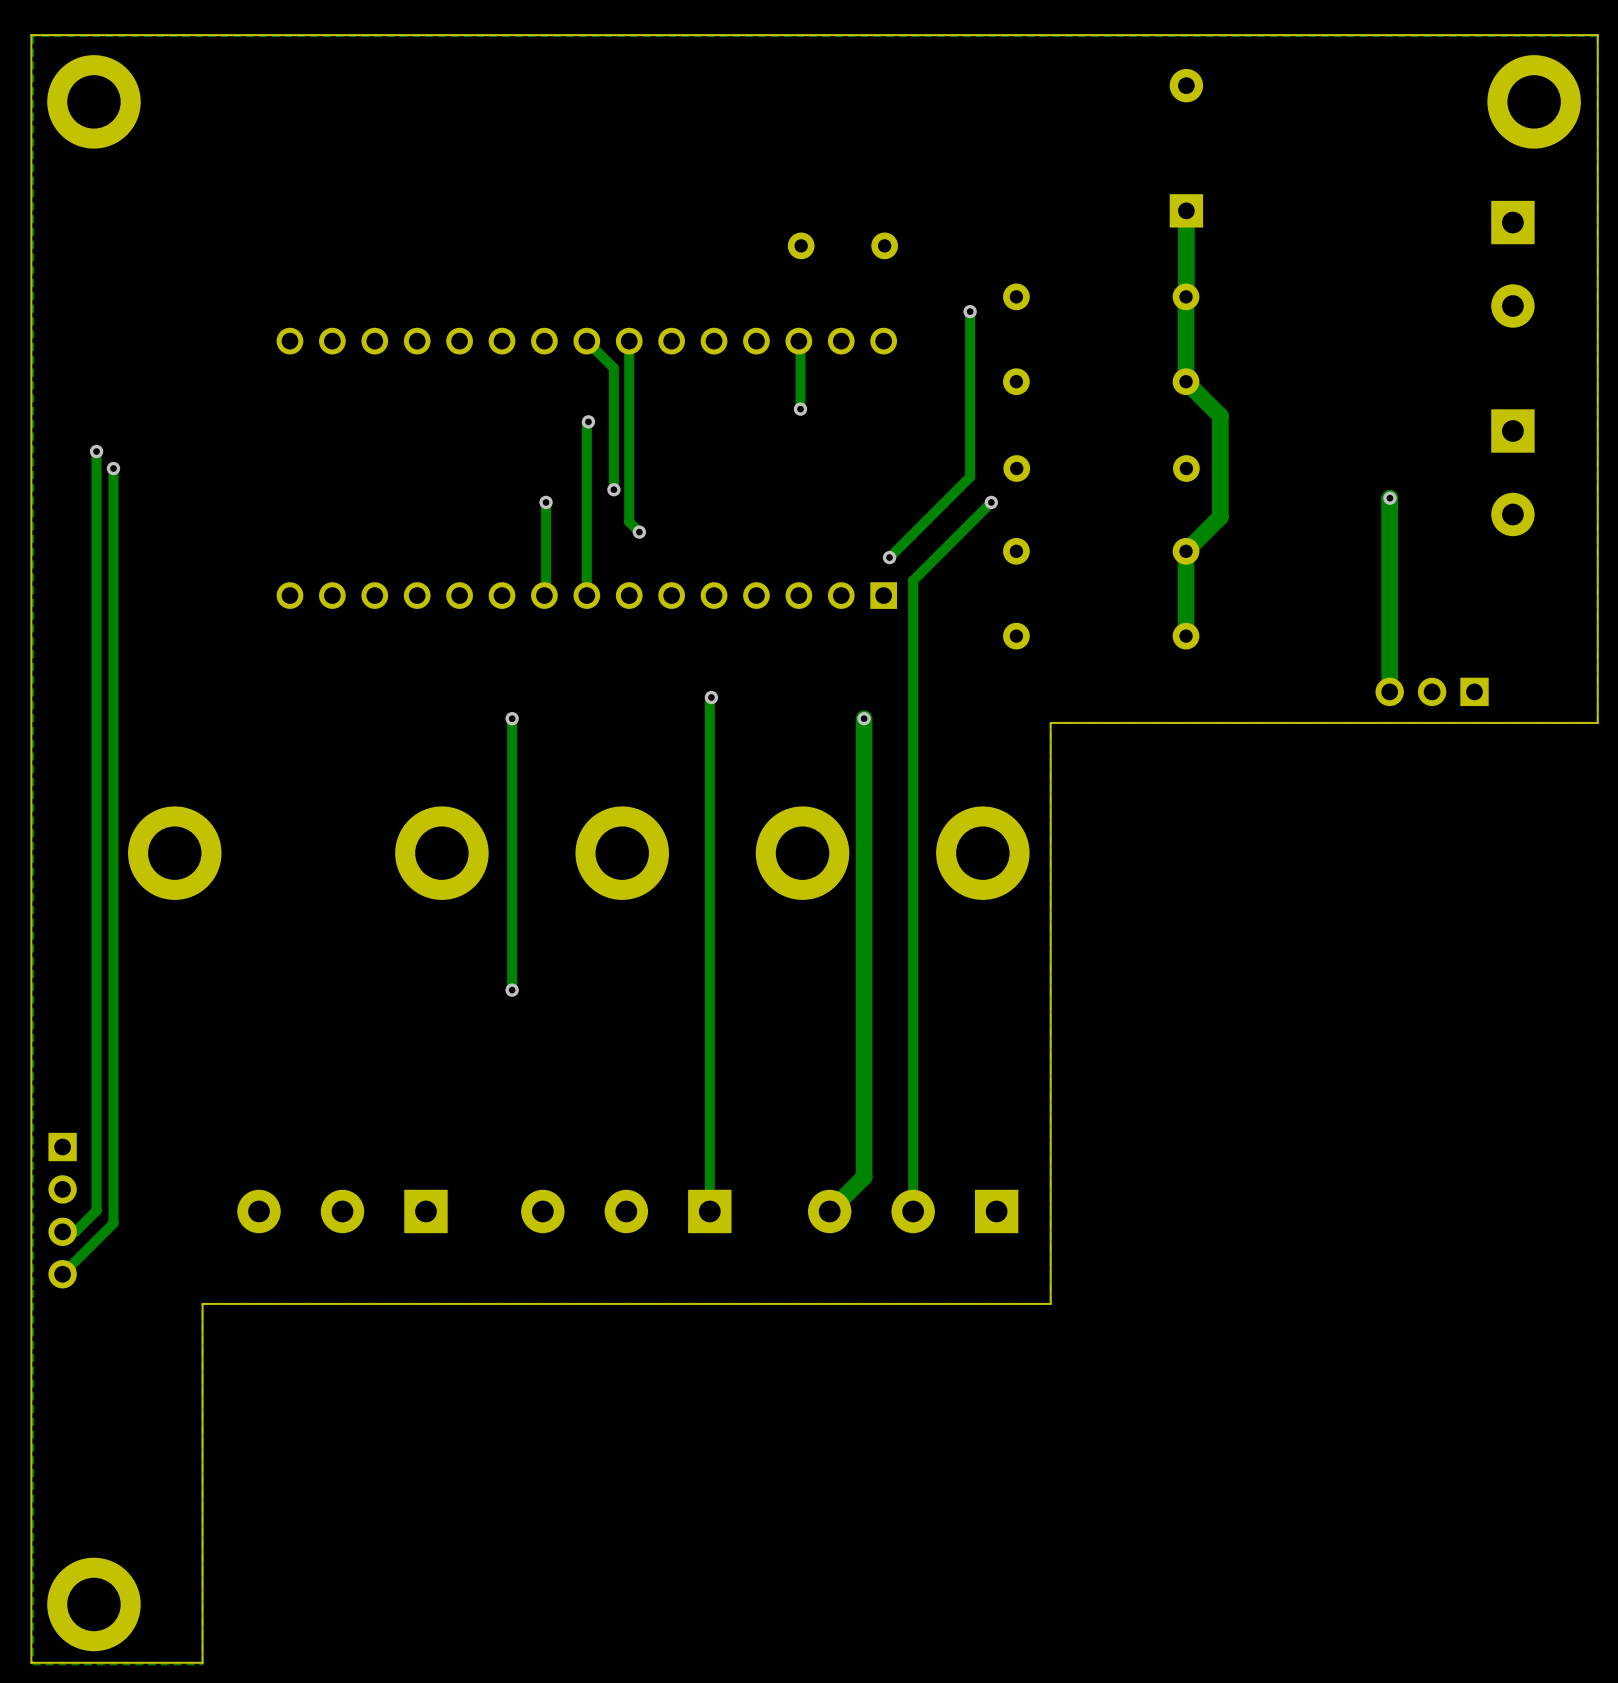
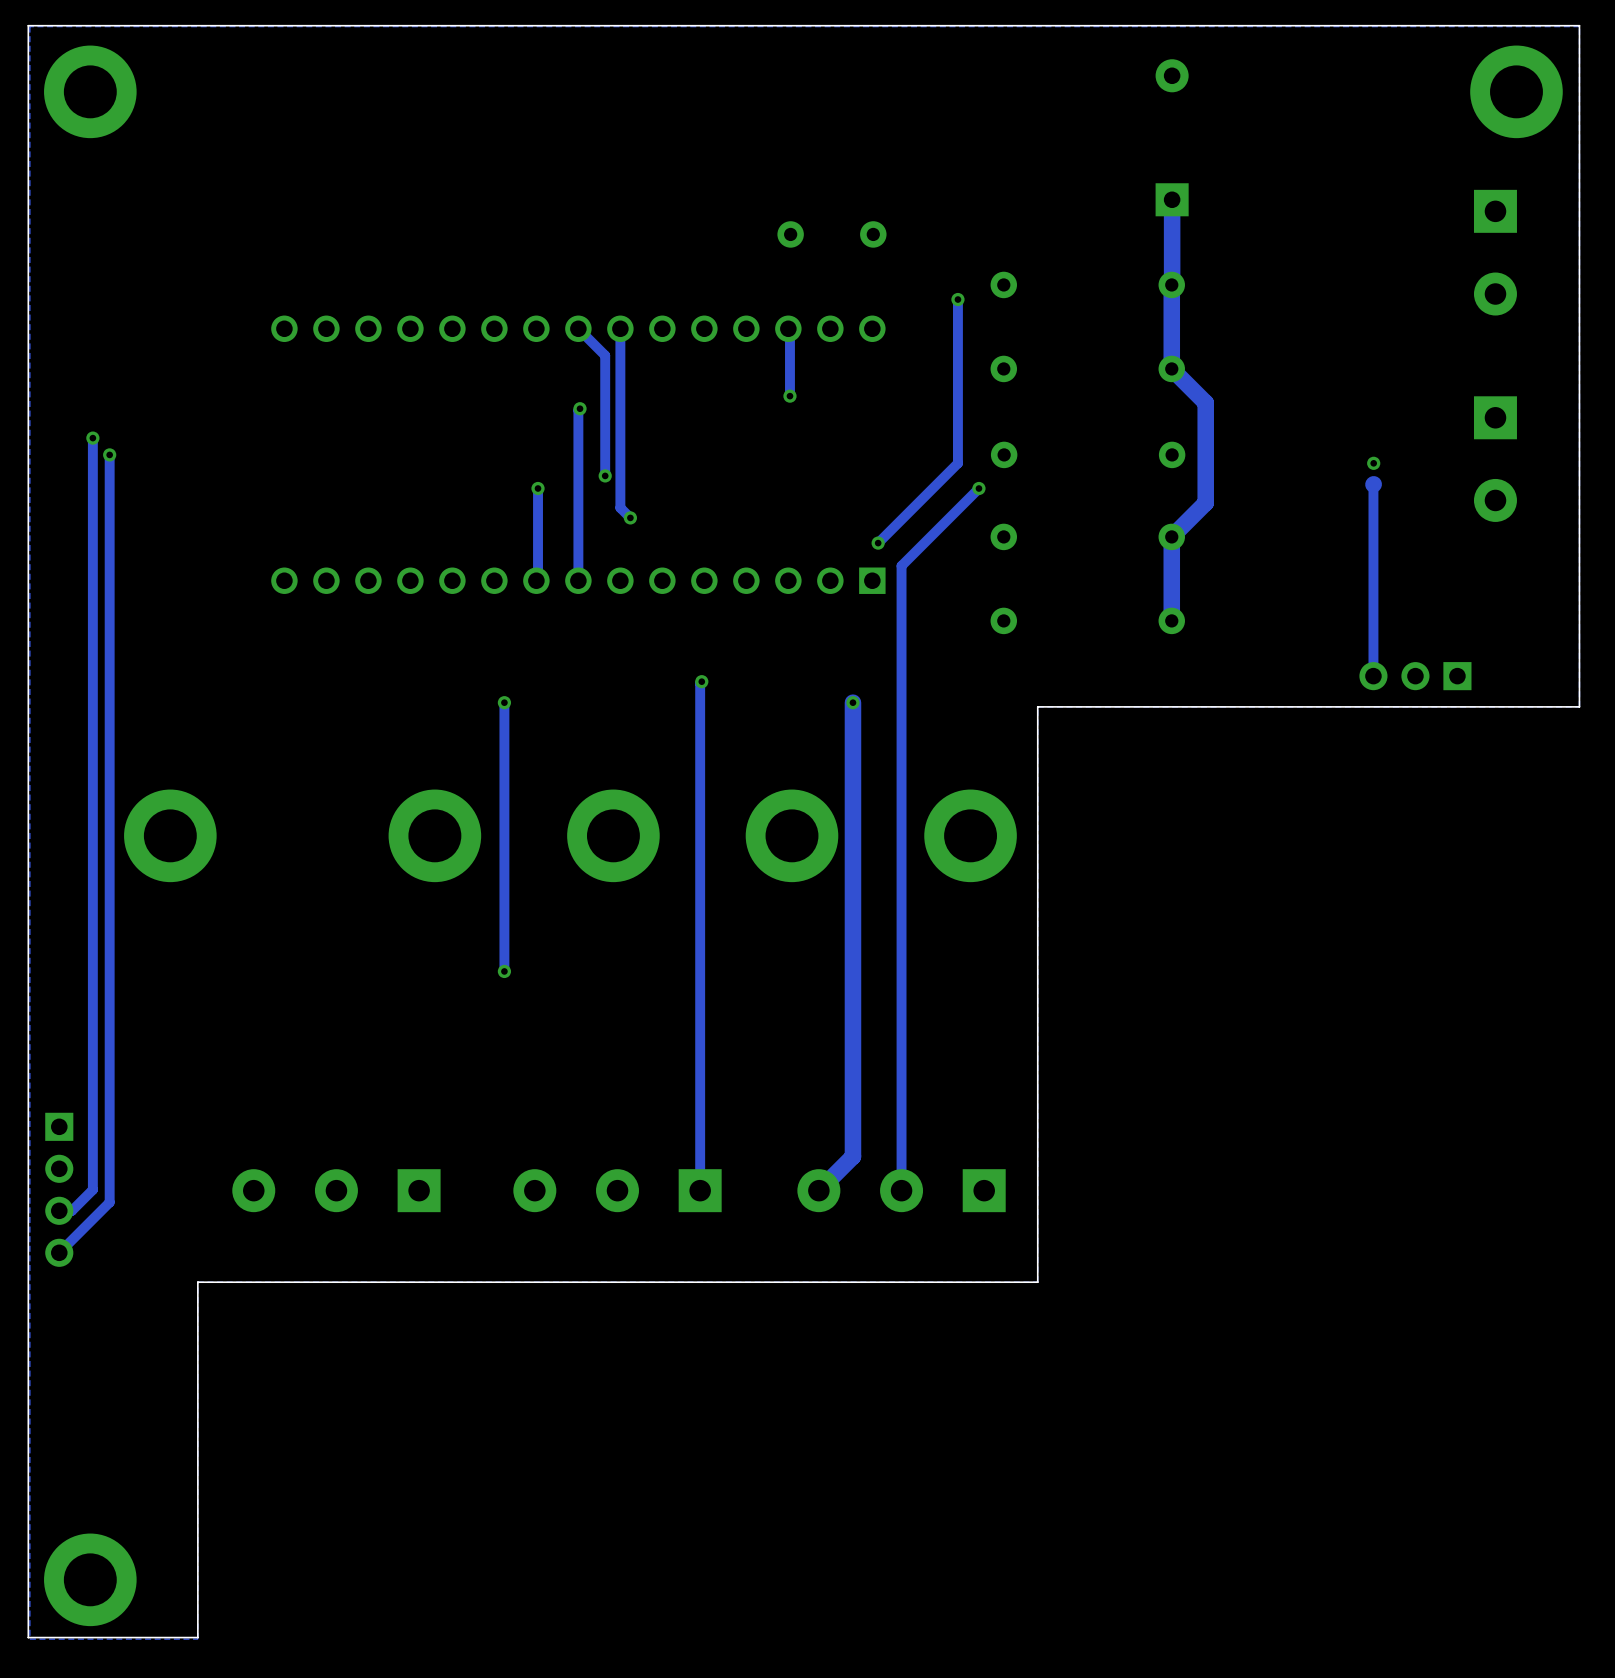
track width: thick (1389, 498) (1389, 691) -> thin (1373, 484) (1373, 676)
via position: (1389, 498) -> (1373, 463)

